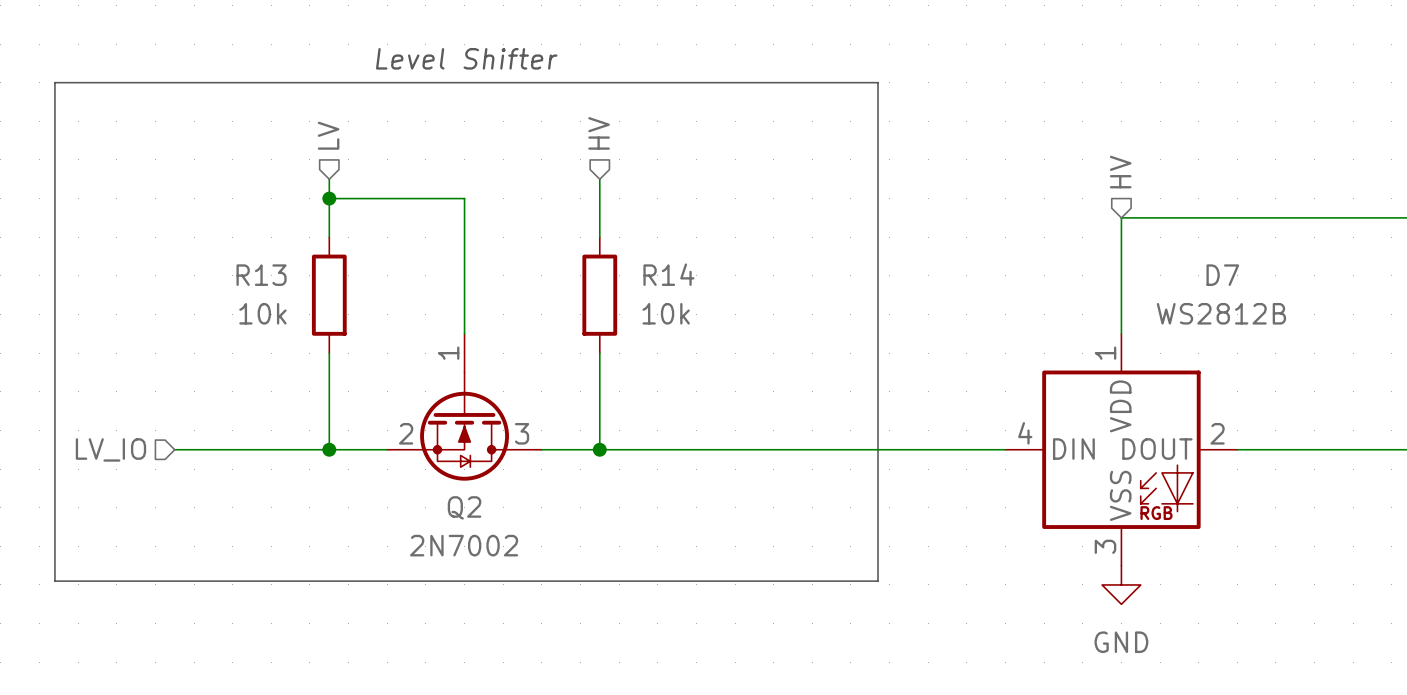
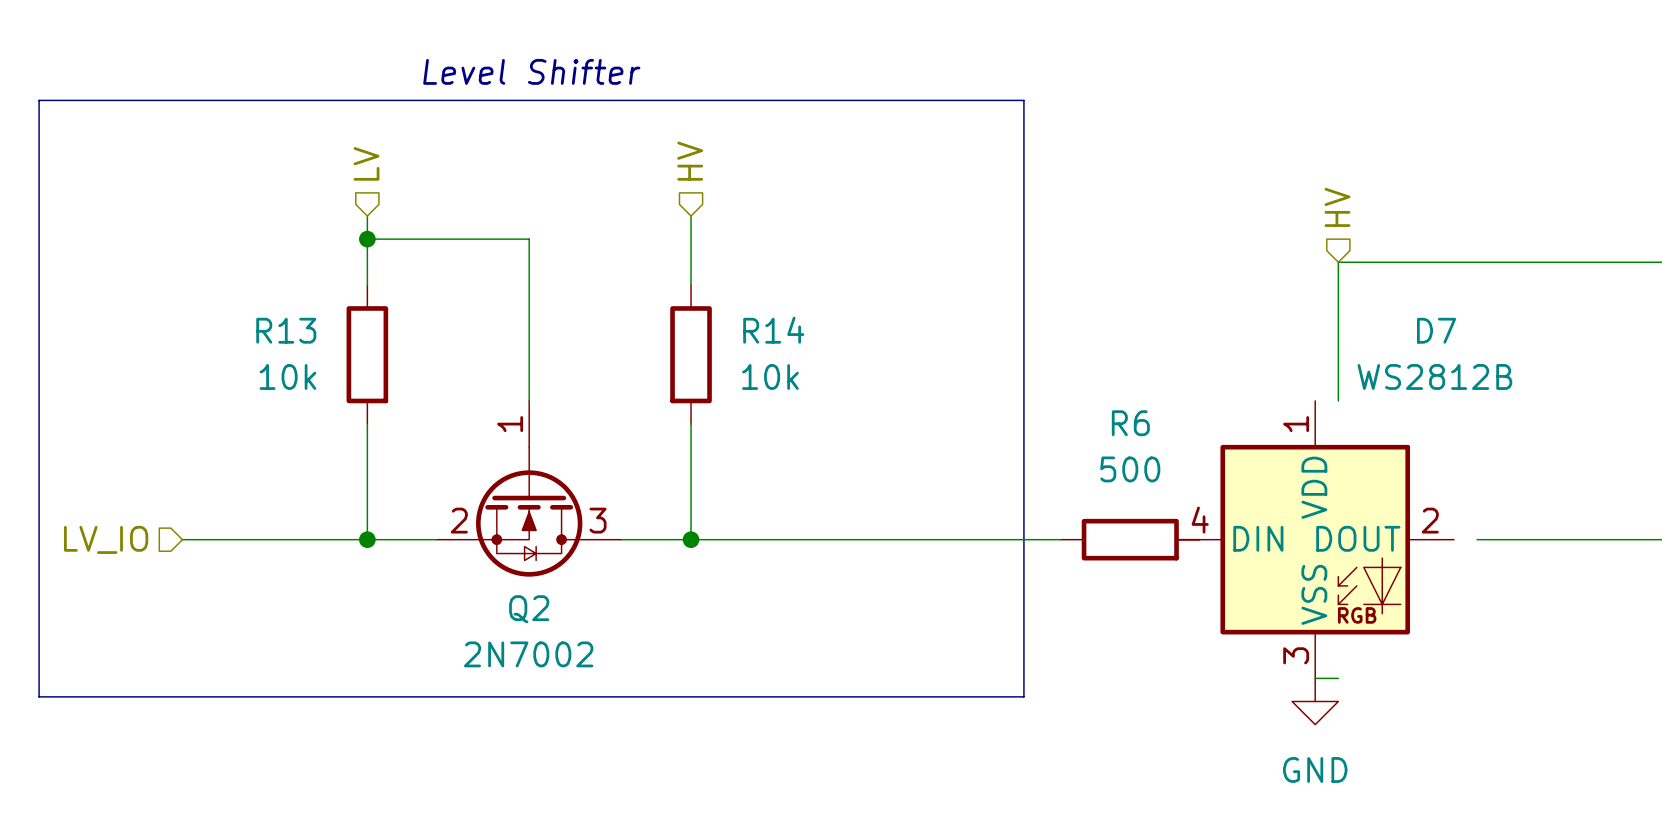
hierarchical label position: HV (1120, 172) -> HV (1337, 207)
wire: (1140, 217) (1121, 217) (1121, 333) -> (1338, 262) (1338, 400)
wire: (908, 449) (1005, 449) -> none
R6: none -> 500 (1130, 539)
wire: (1237, 449) (1256, 449) -> (1315, 678) (1338, 678)

